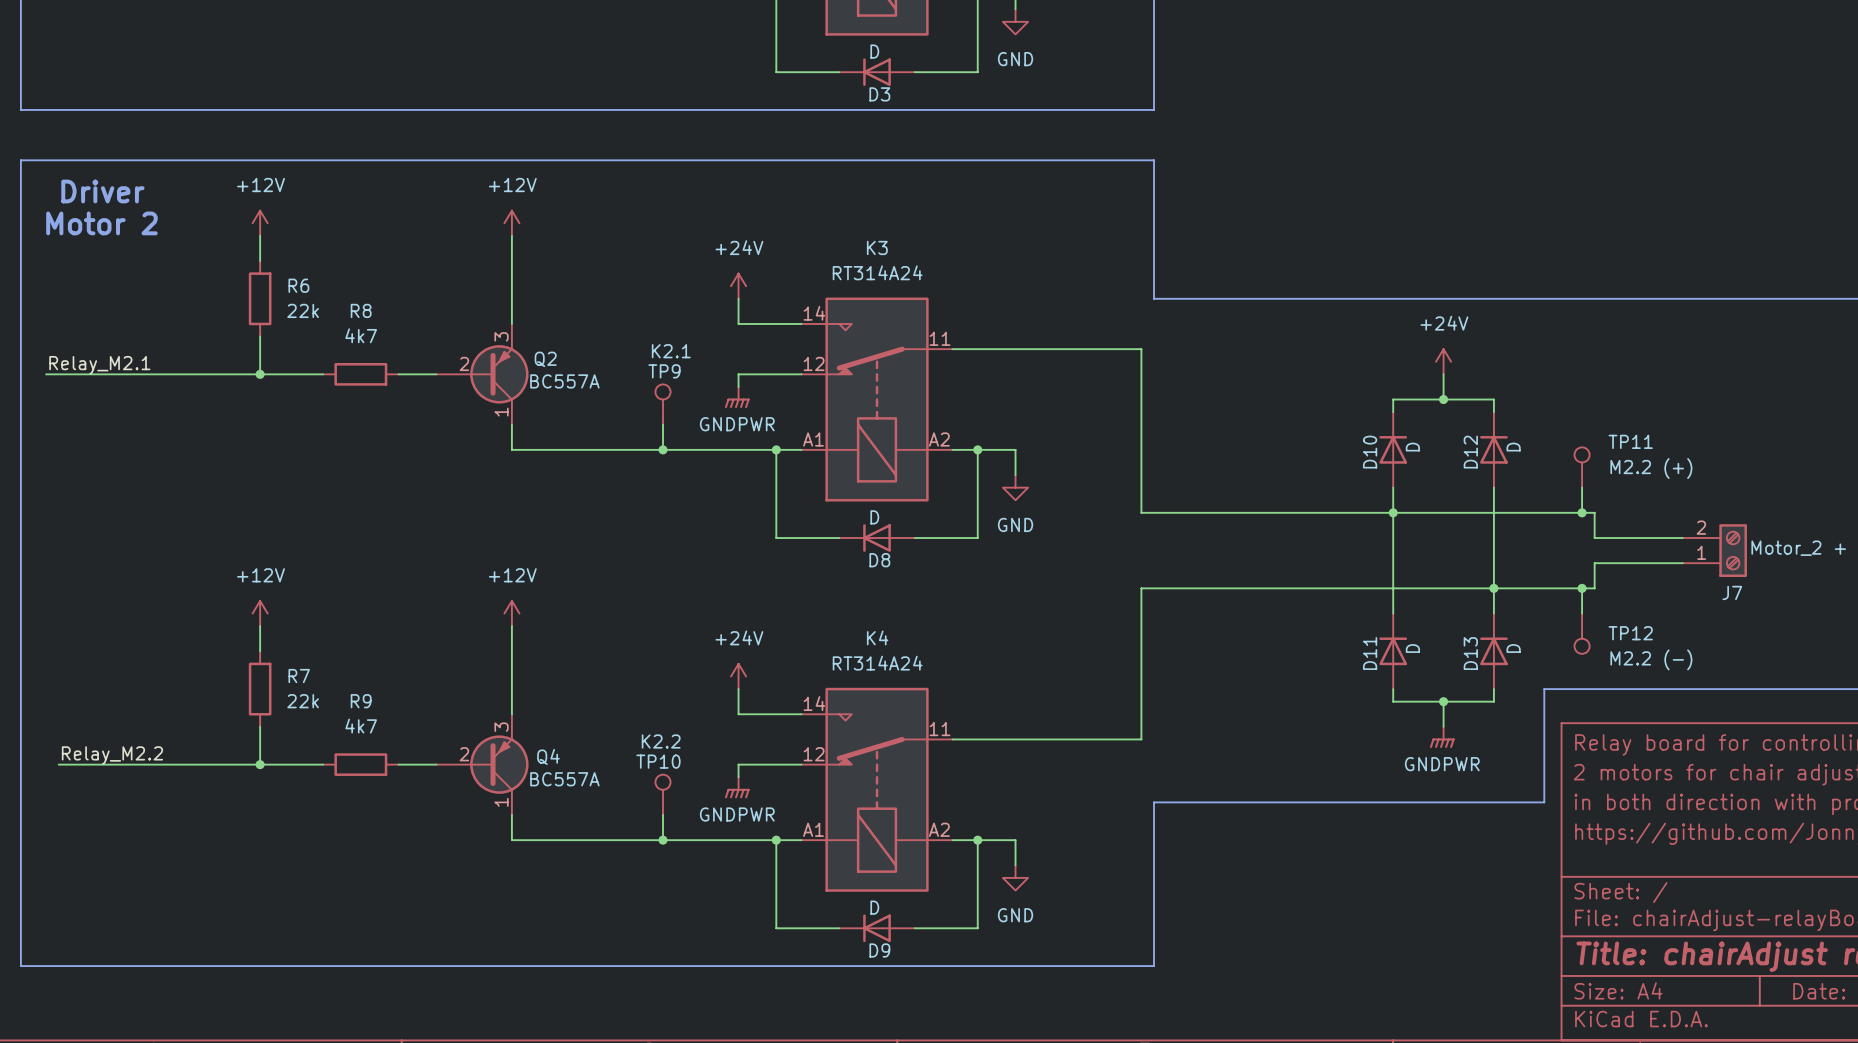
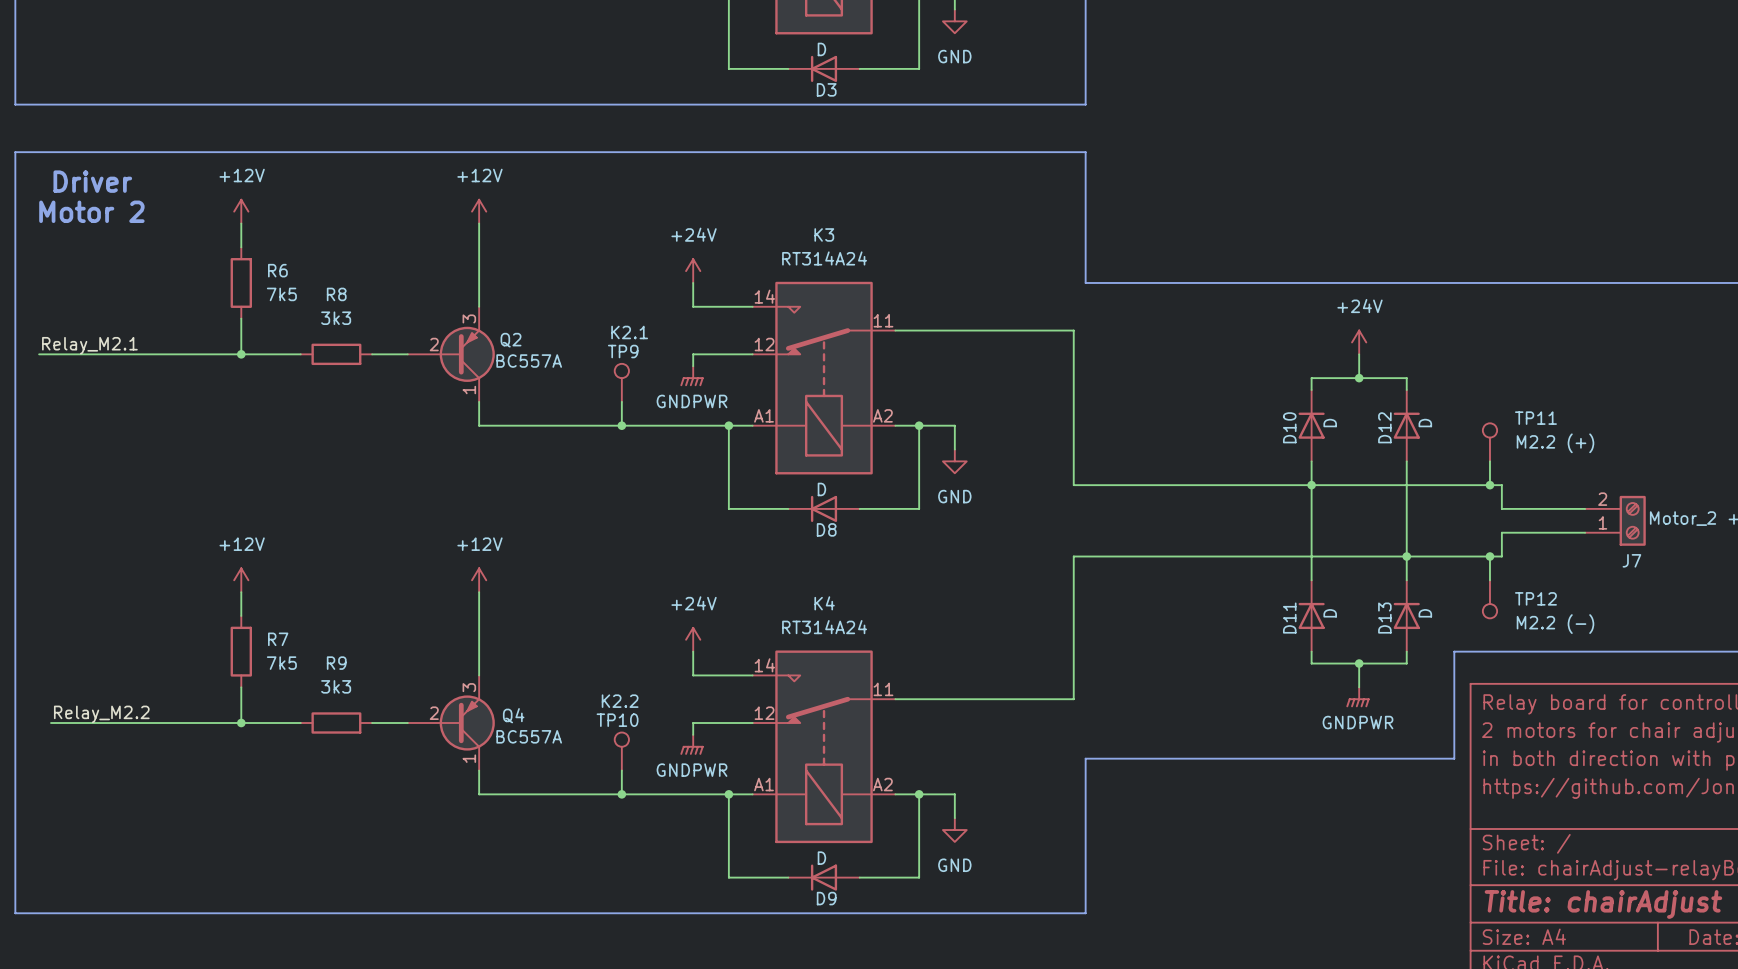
R6 value: 22k (303, 310) -> 7k5 (281, 294)
R8 value: 4k7 (361, 335) -> 3k3 (336, 318)
R7 value: 22k (303, 701) -> 7k5 (281, 663)
R9 value: 4k7 (361, 726) -> 3k3 (336, 686)

